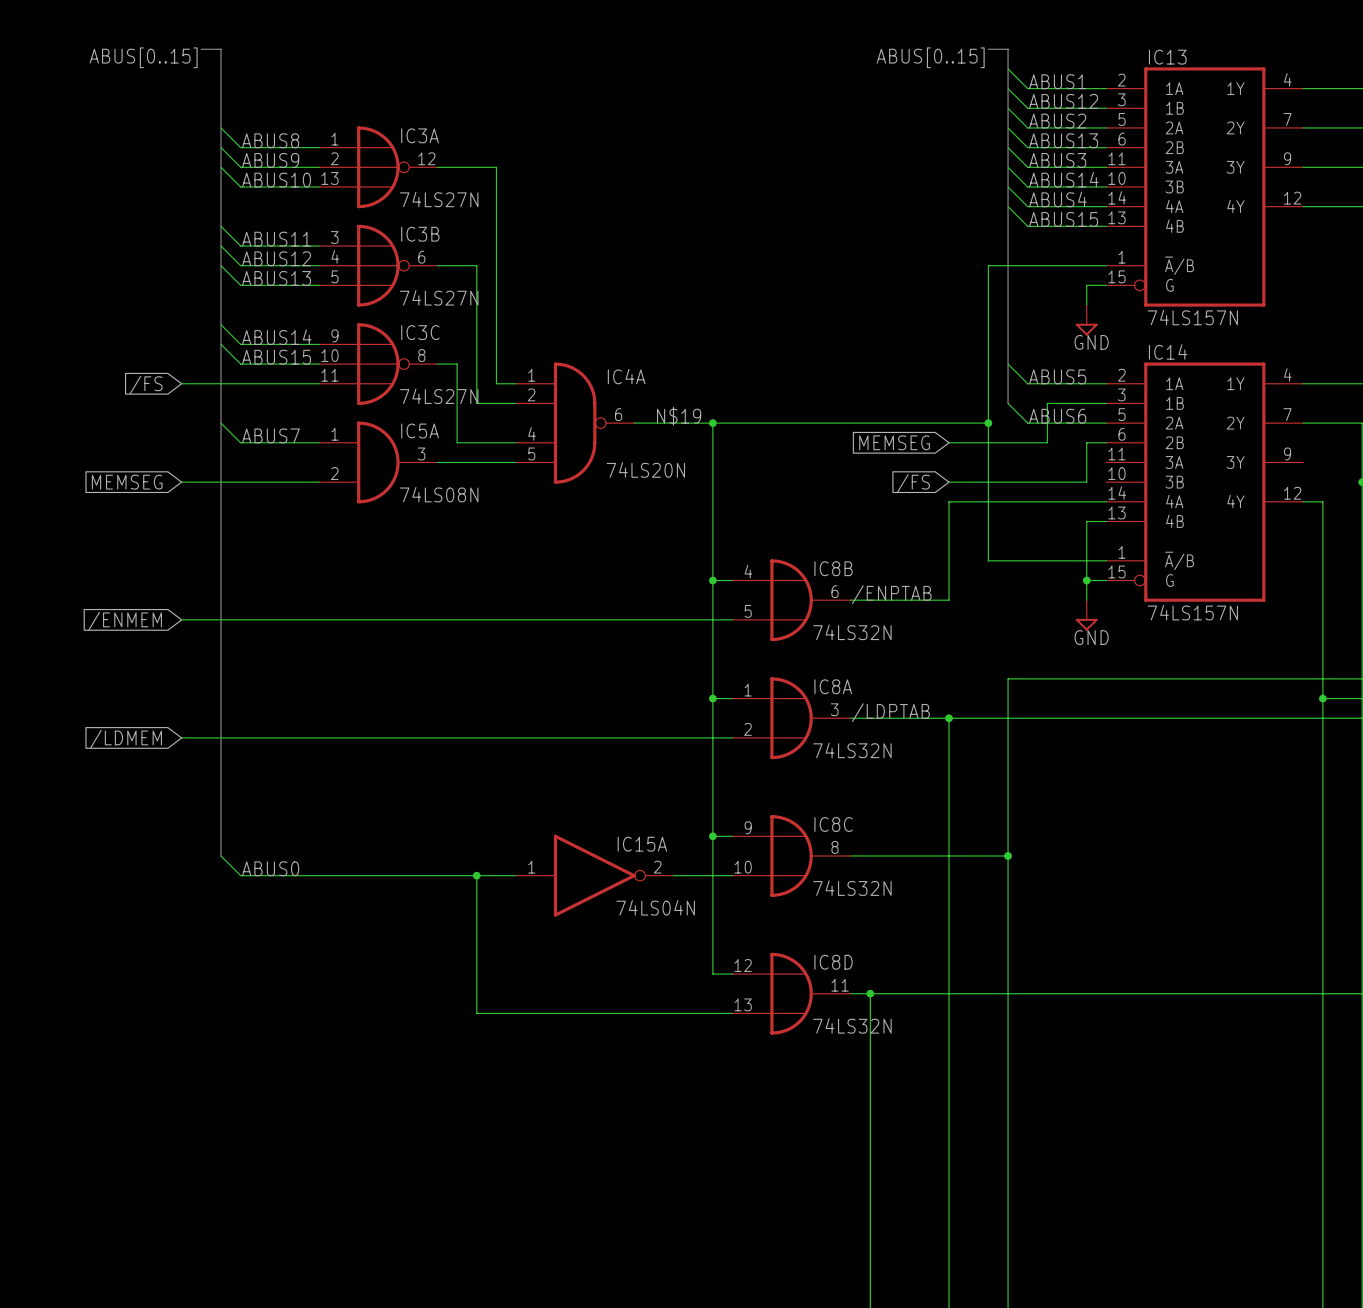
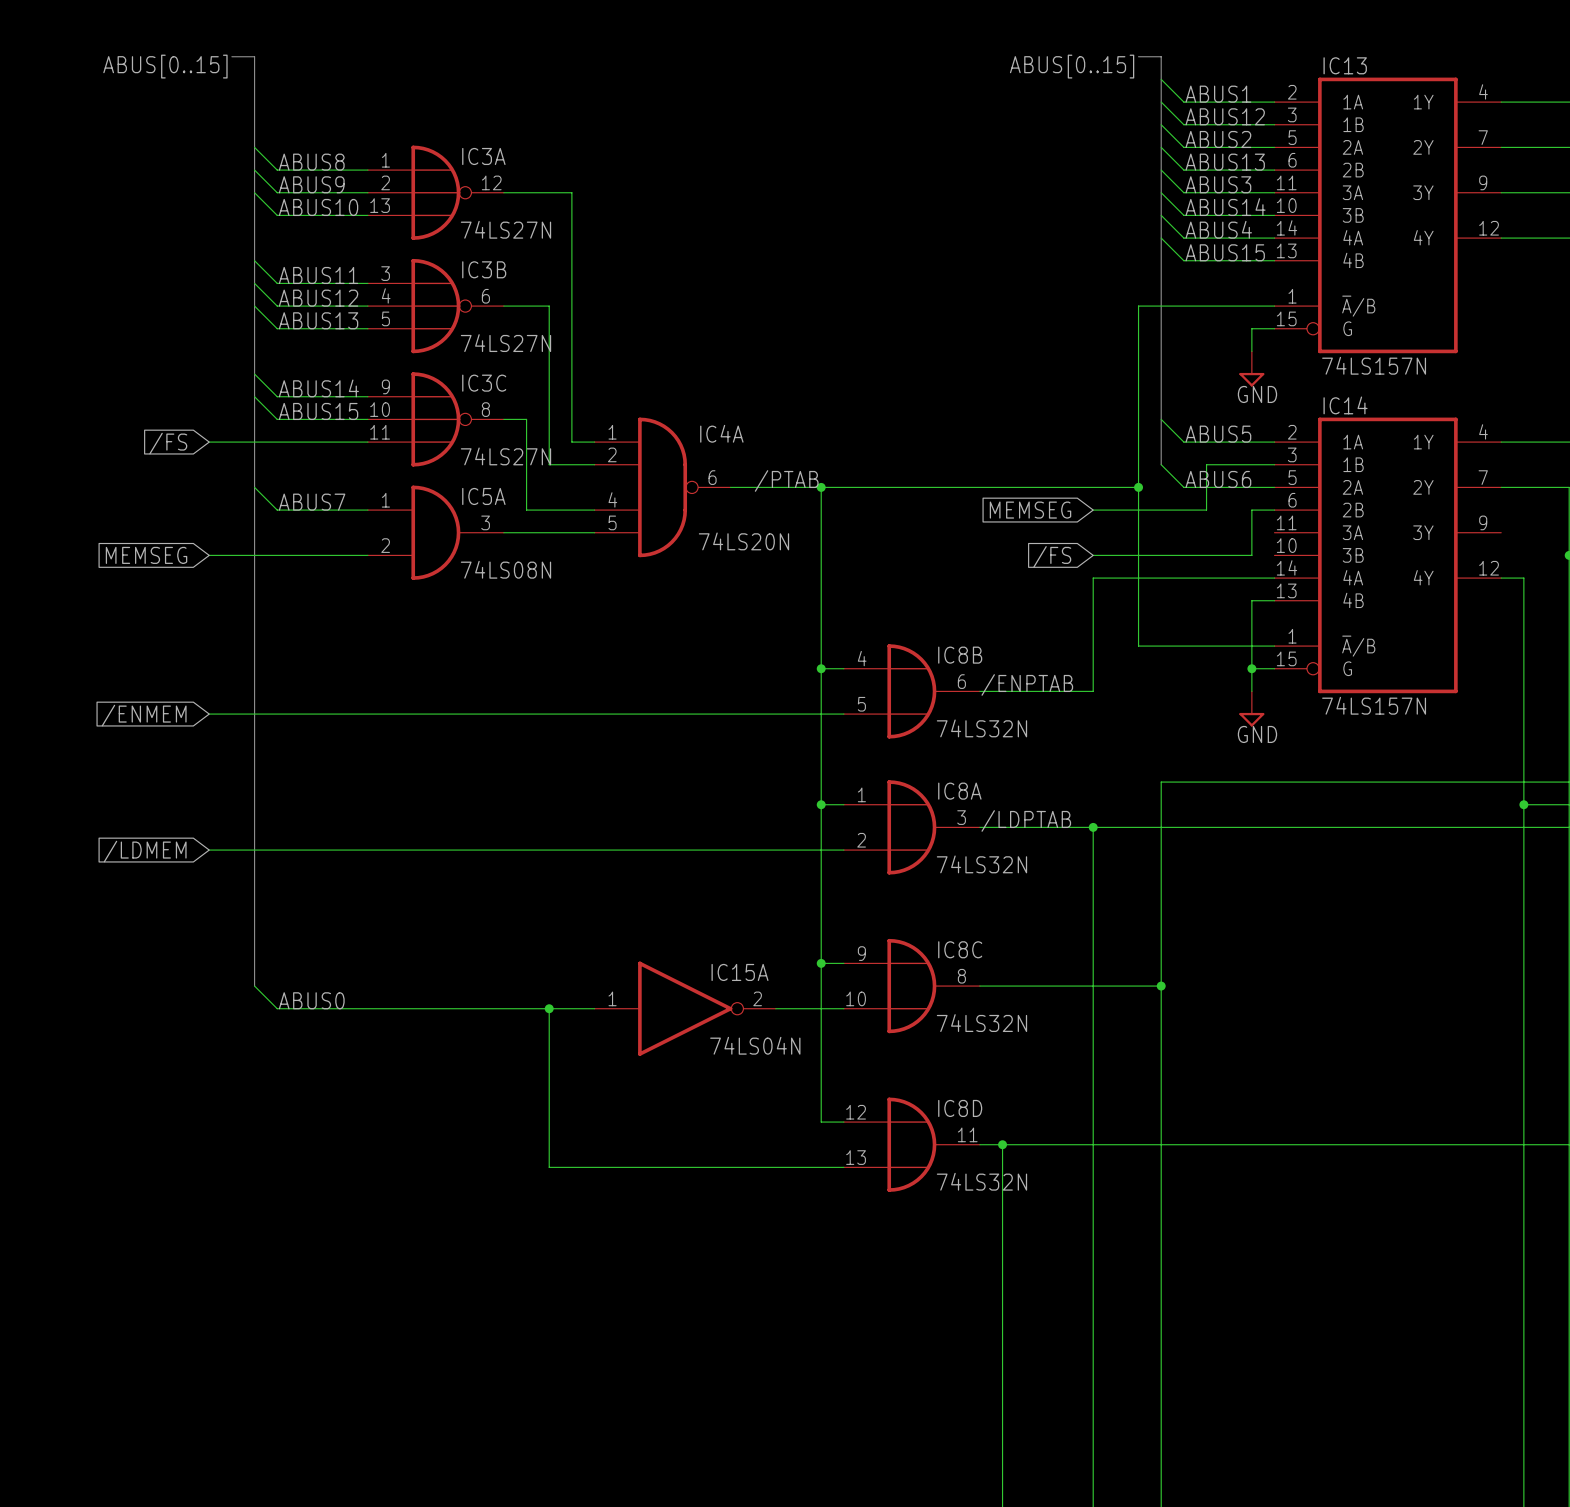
label: N$19 (679, 416) -> /PTAB (786, 480)

